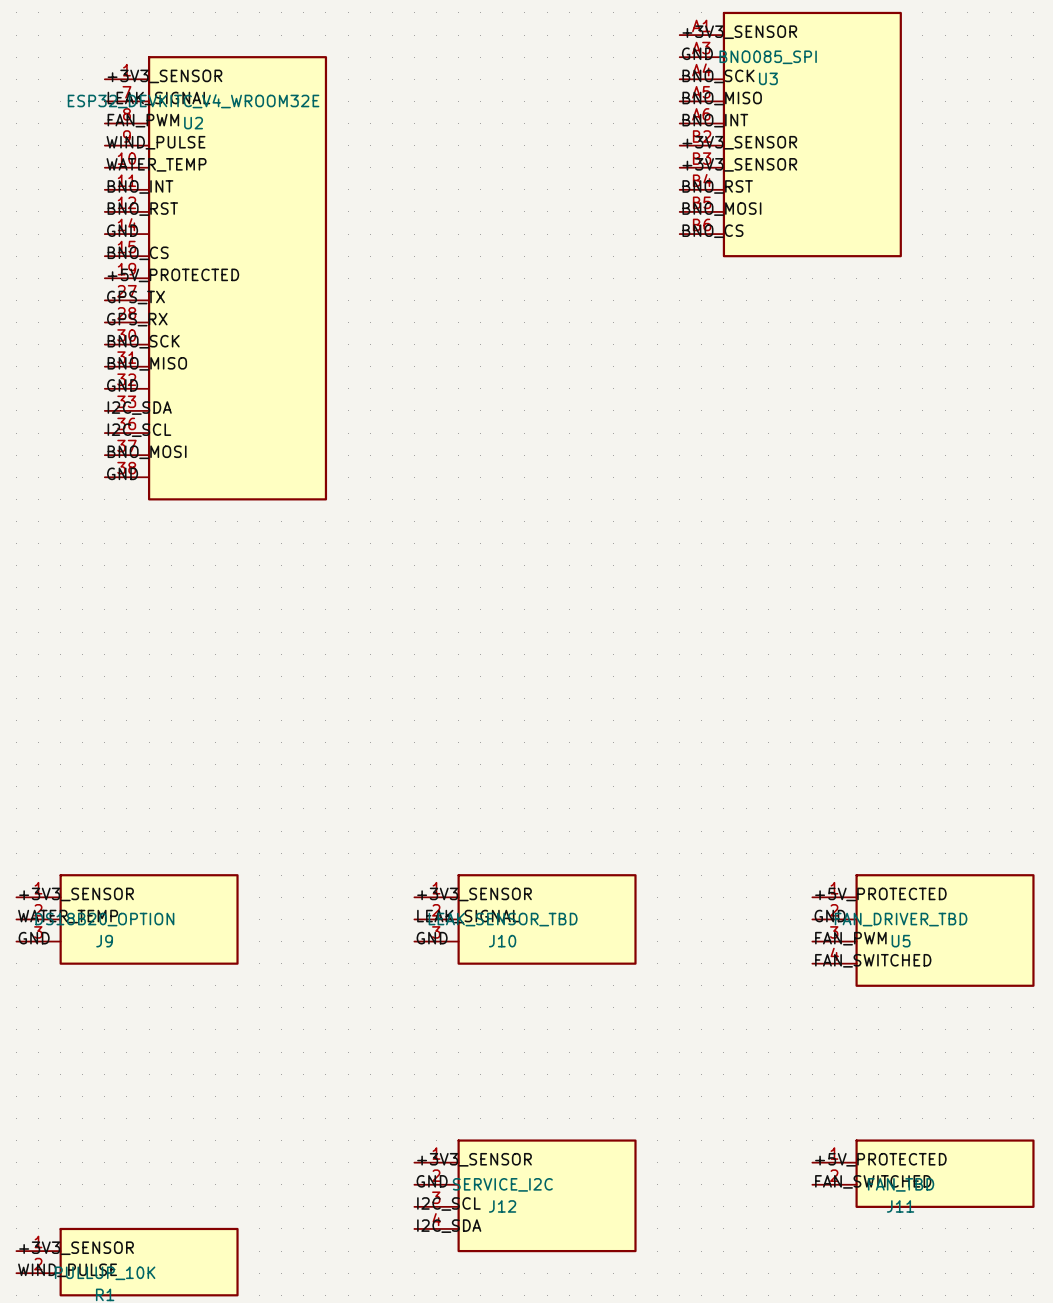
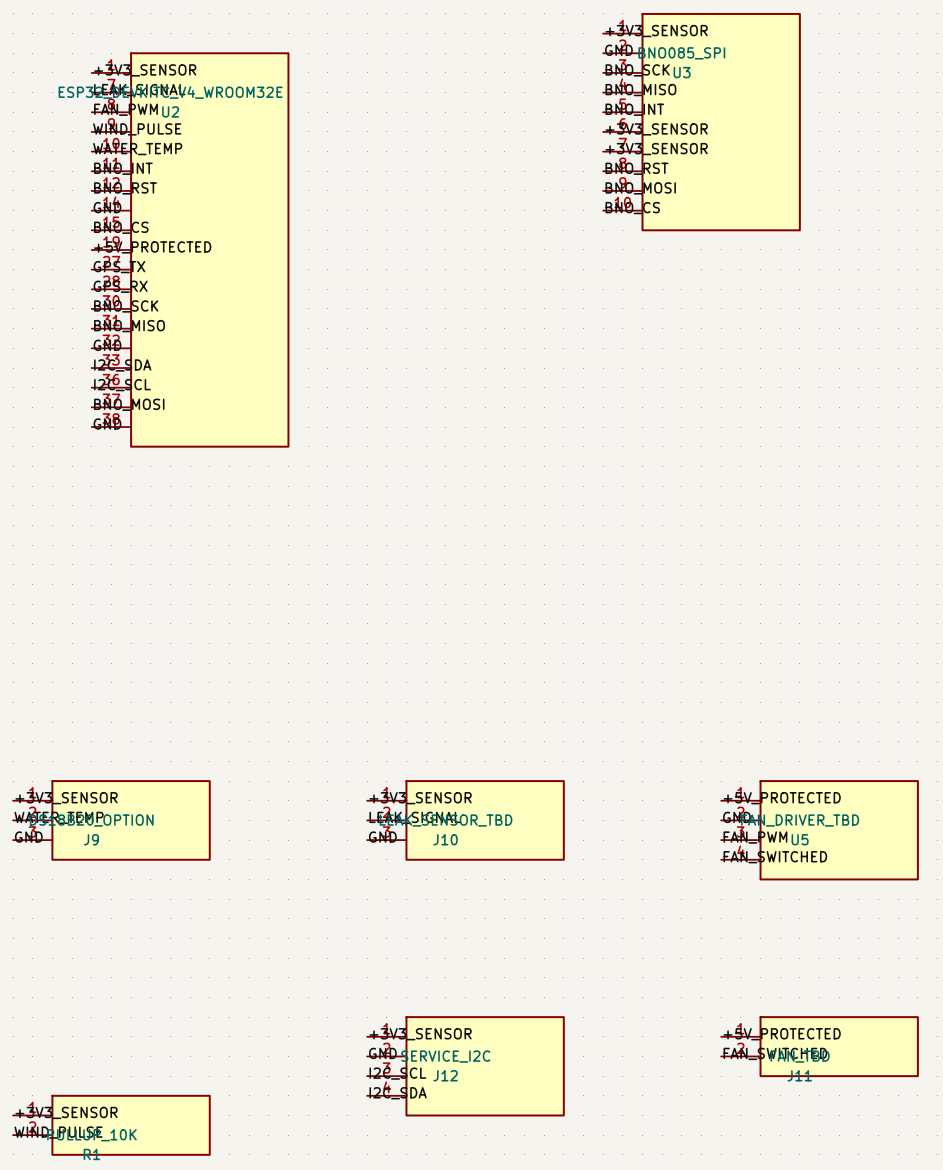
U3 symbol: [679, 11, 902, 258] -> [603, 12, 801, 232]

